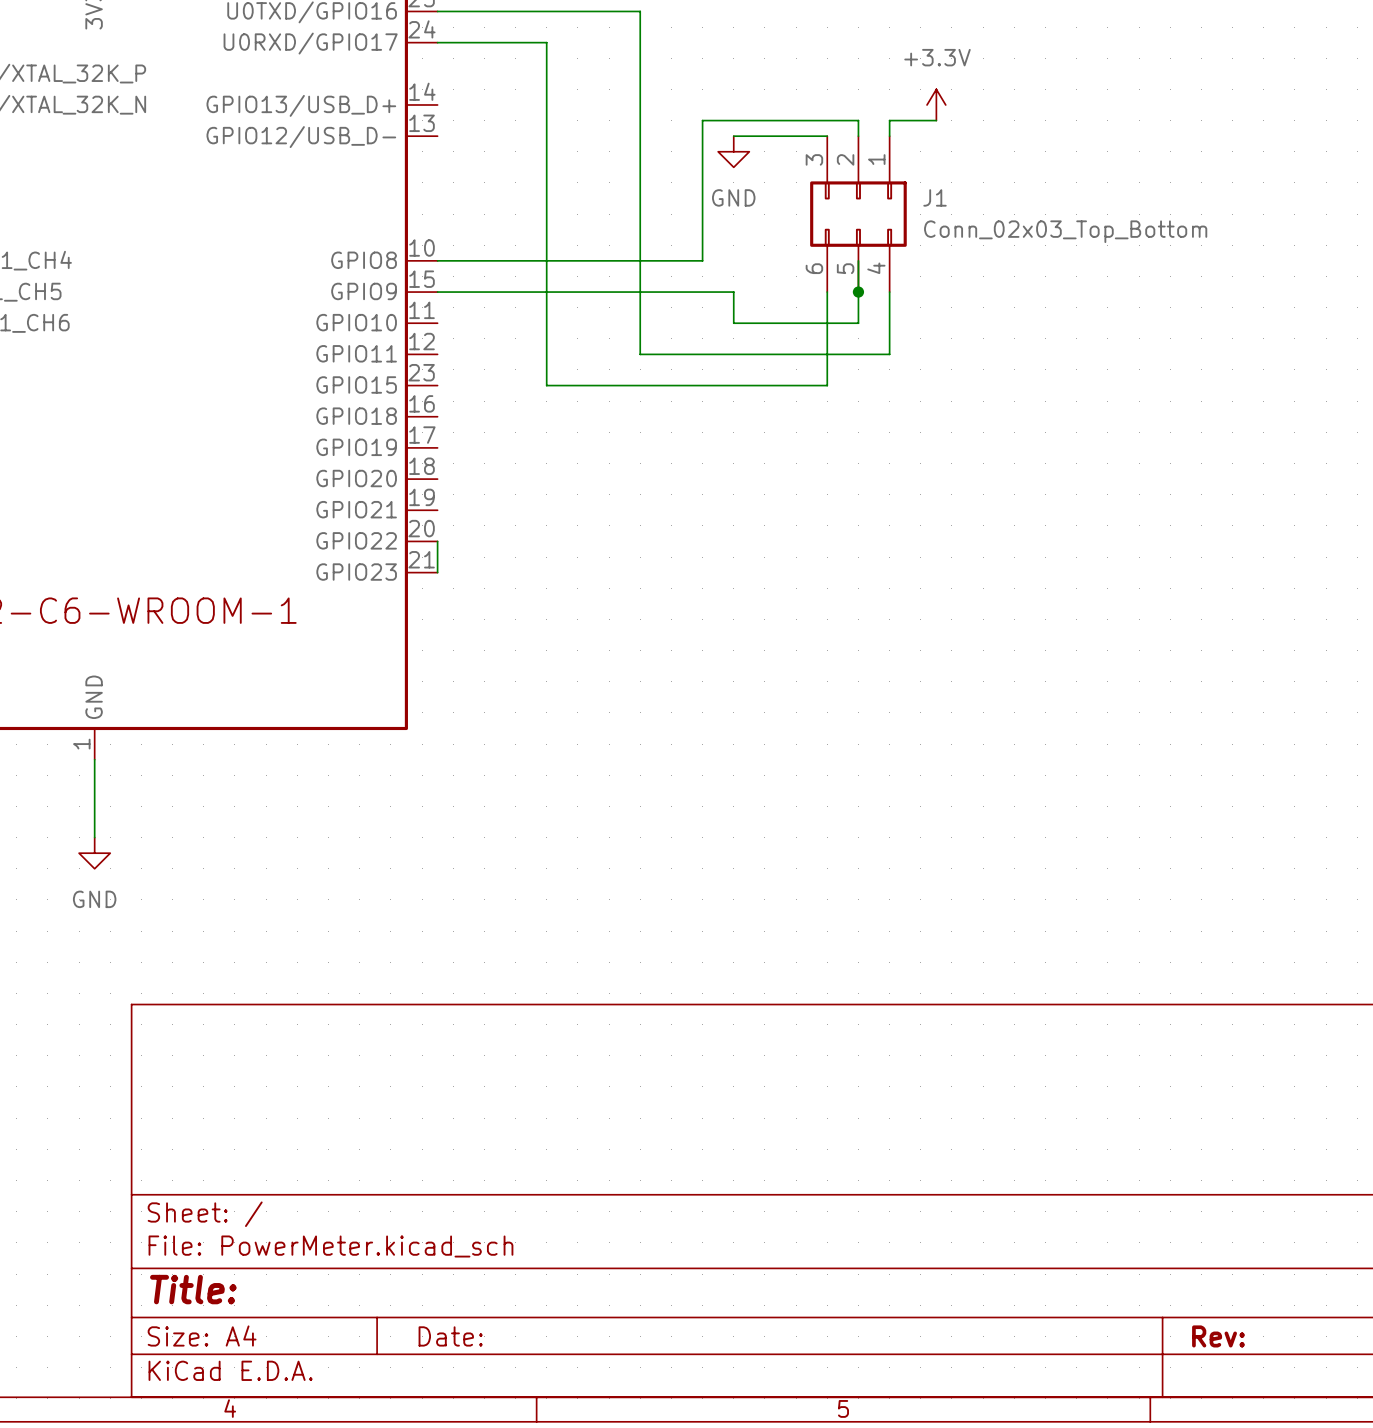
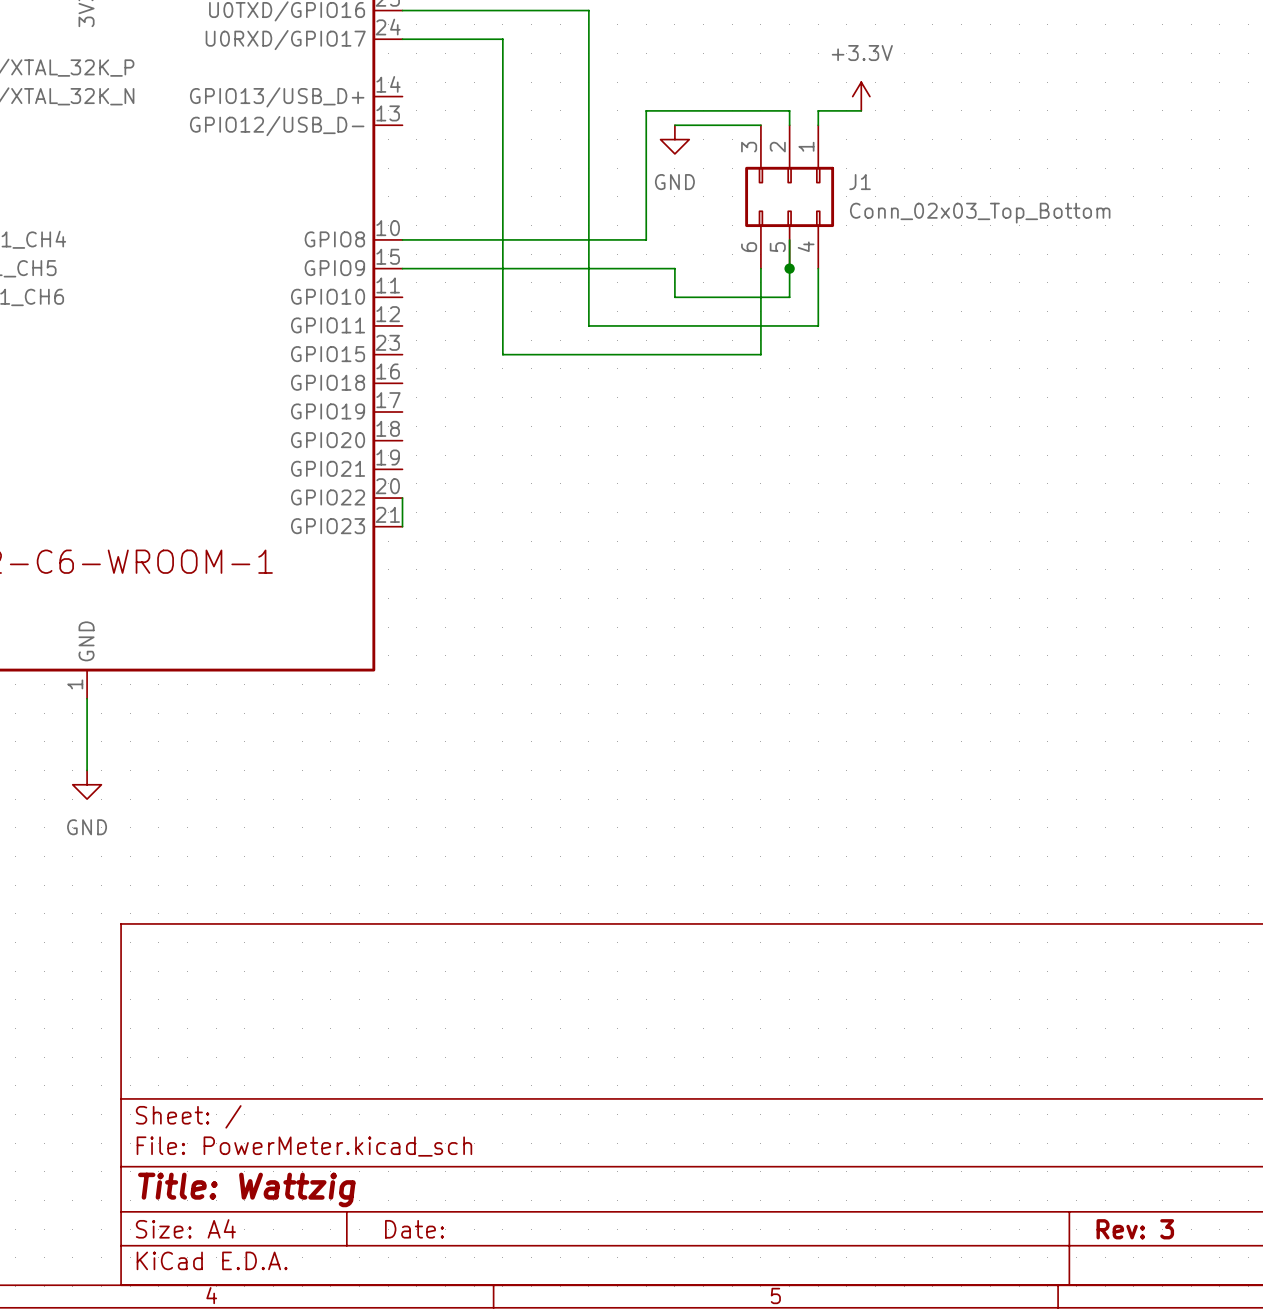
title block: Title: (193, 1289) -> Title: Wattzig (246, 1189)
title block: Rev: (1218, 1336) -> Rev: 3 (1135, 1229)

